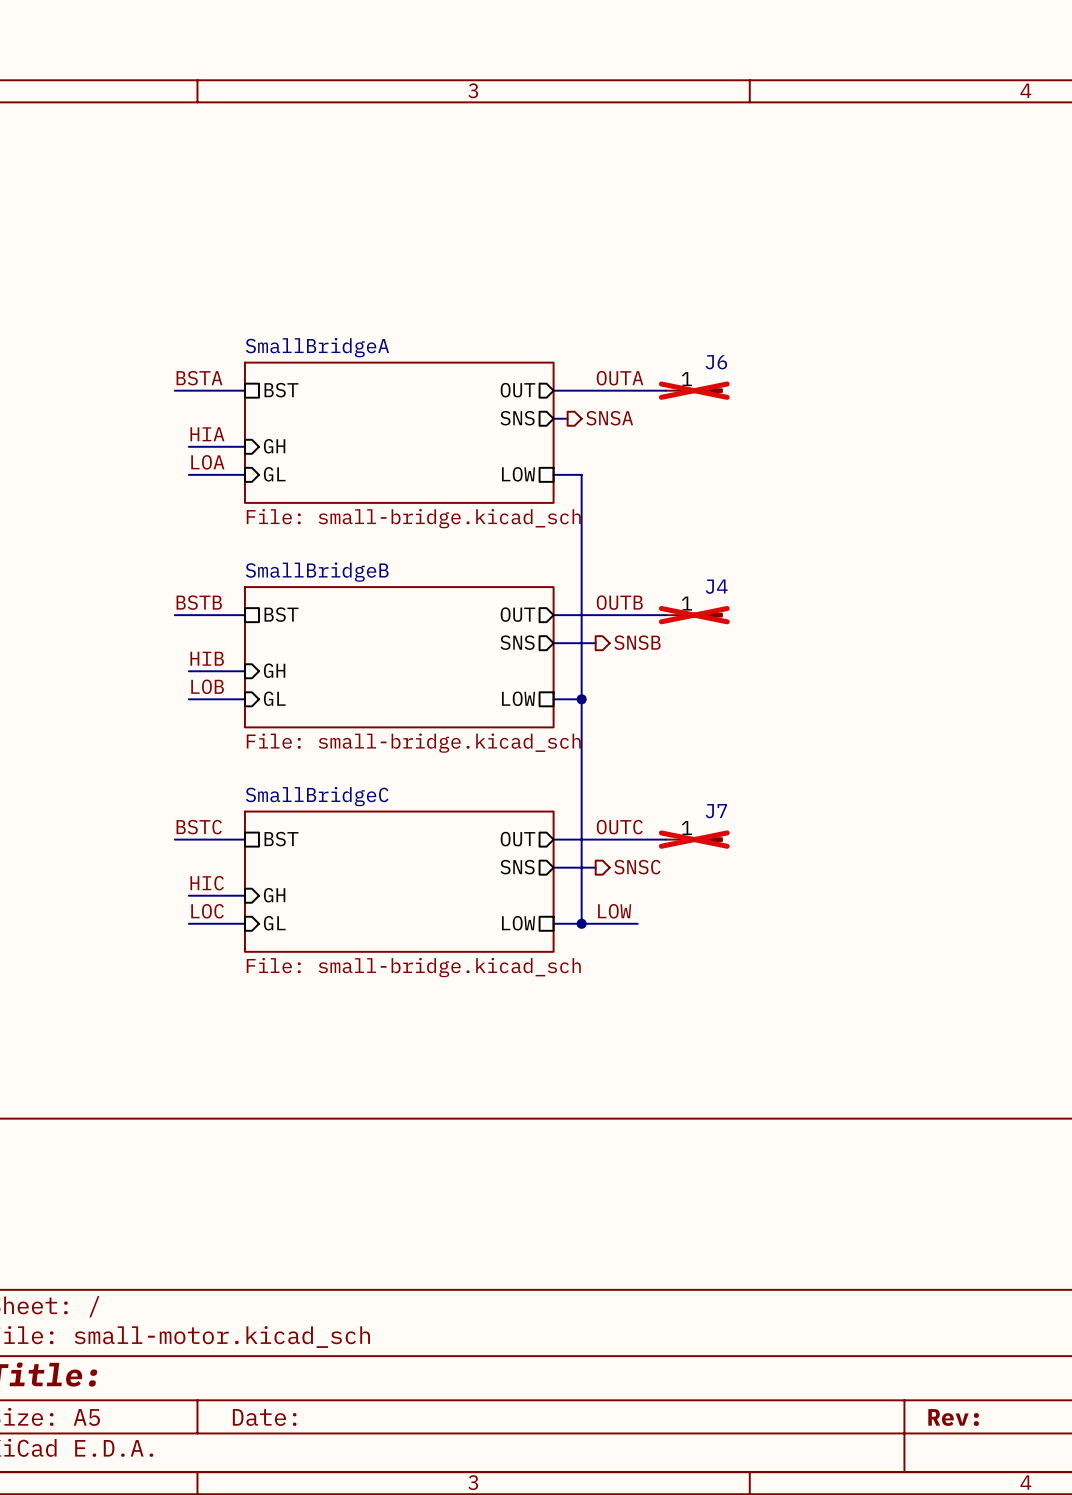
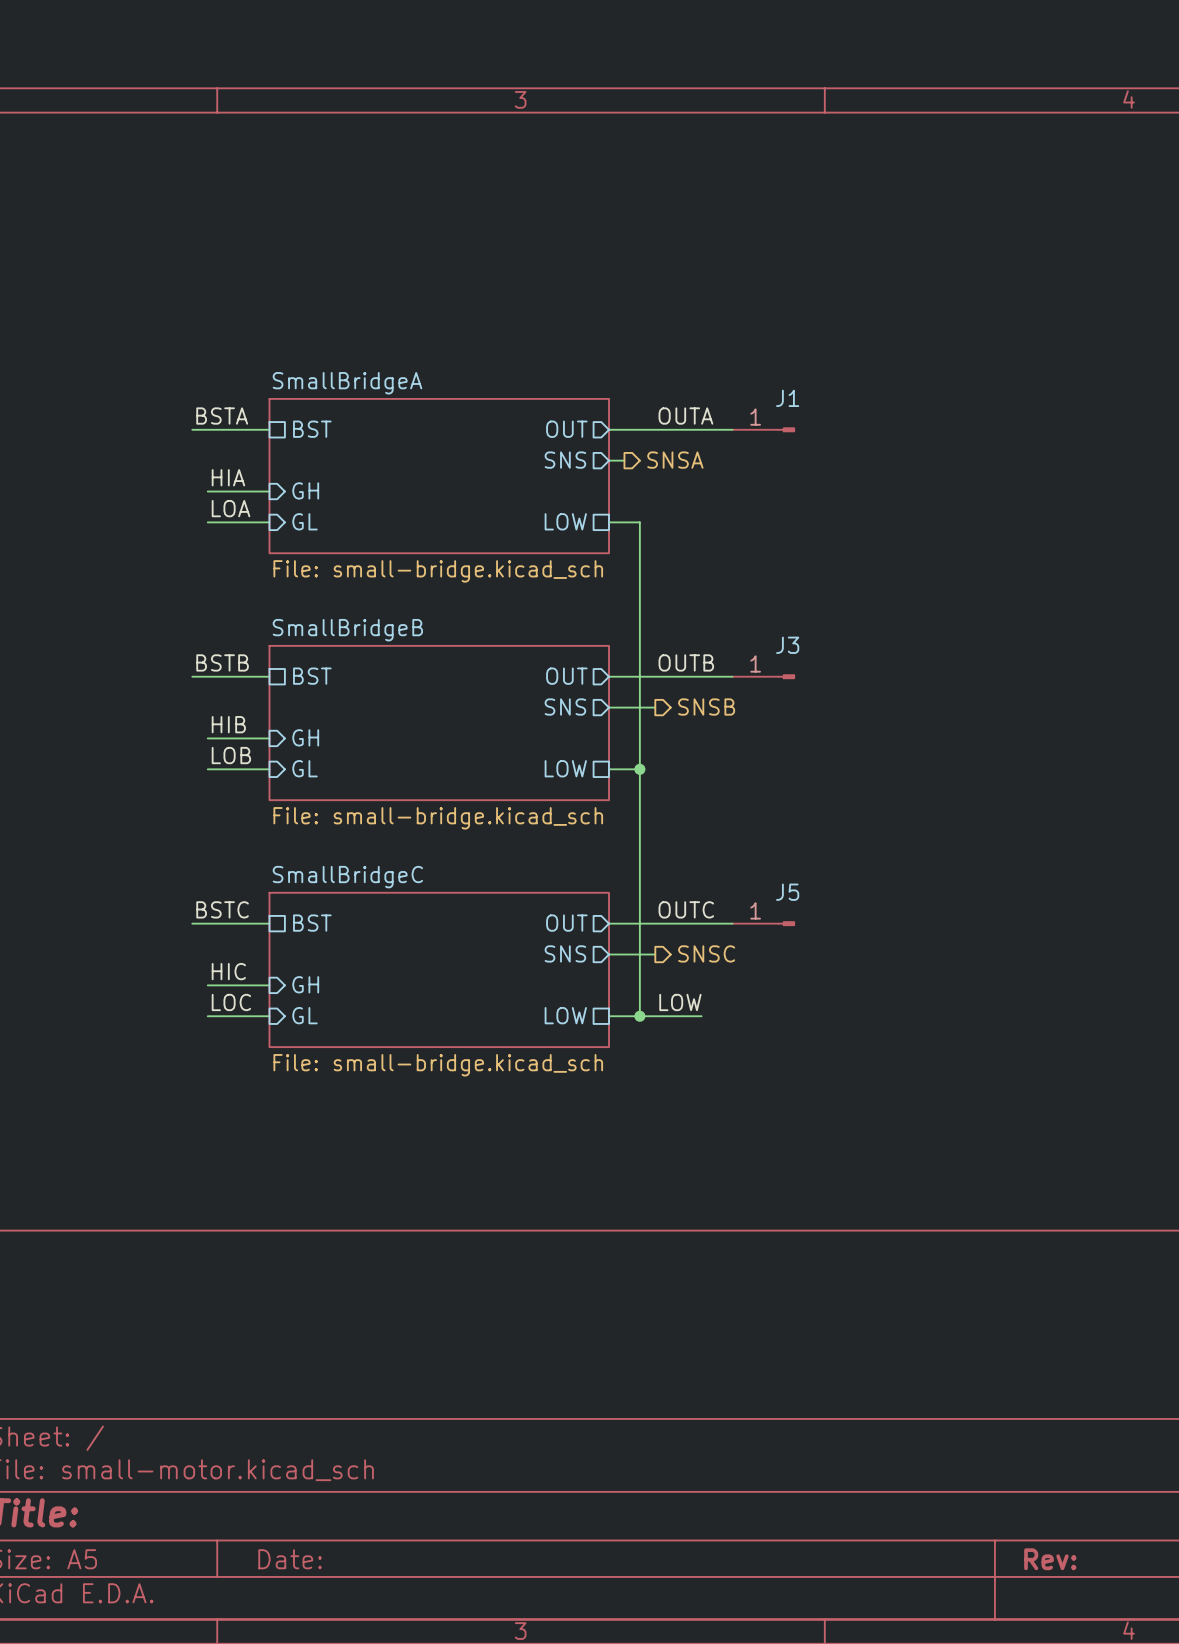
J6 name: J6 (716, 362) -> J1 (787, 398)
J6 do-not-place cross: (694, 390) -> none
J4 name: J4 (716, 586) -> J3 (787, 645)
J4 do-not-place cross: (694, 615) -> none
J7 name: J7 (716, 811) -> J5 (787, 892)
J7 do-not-place cross: (694, 839) -> none

